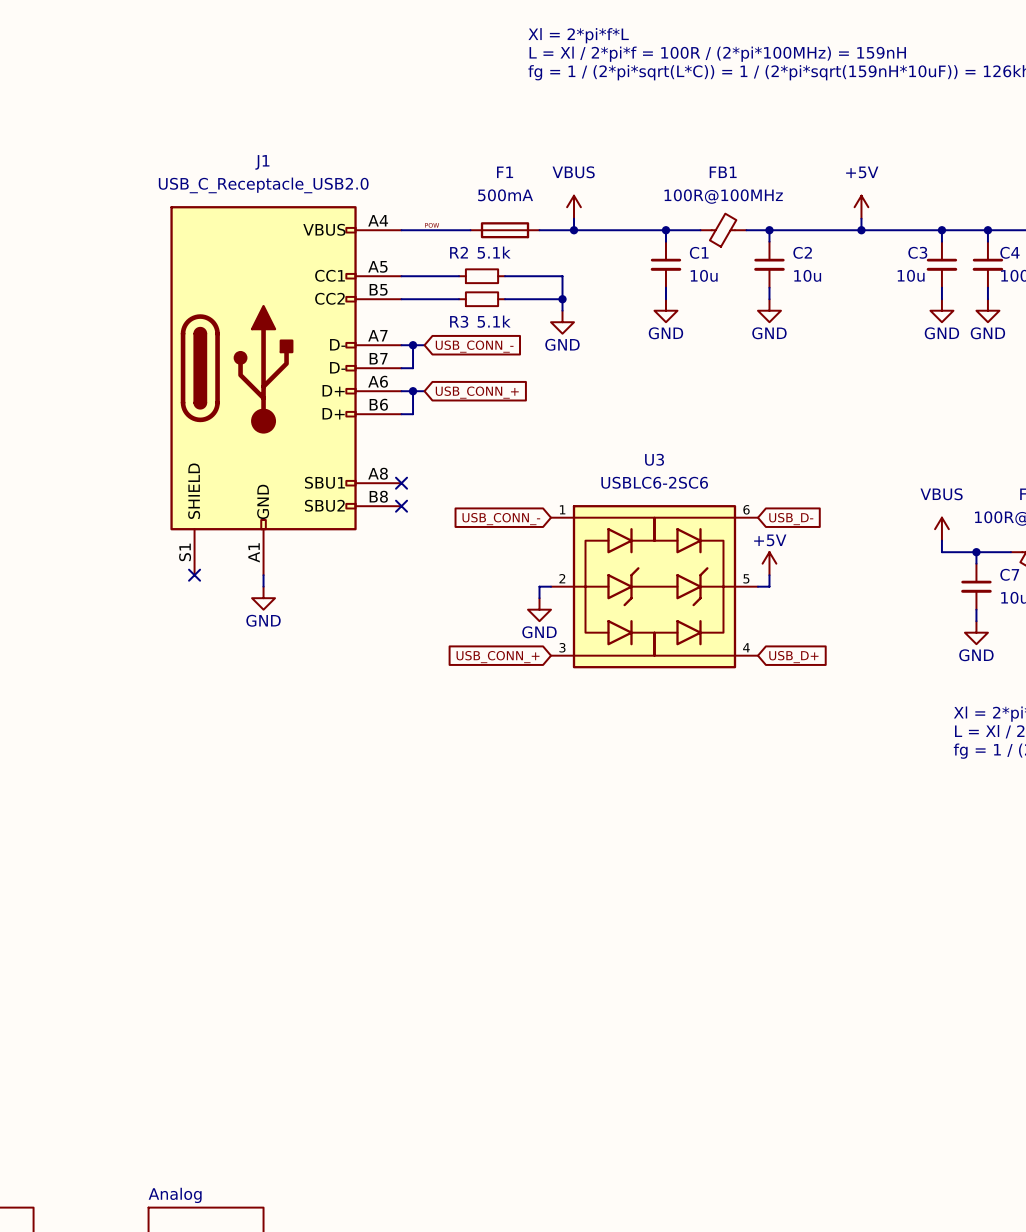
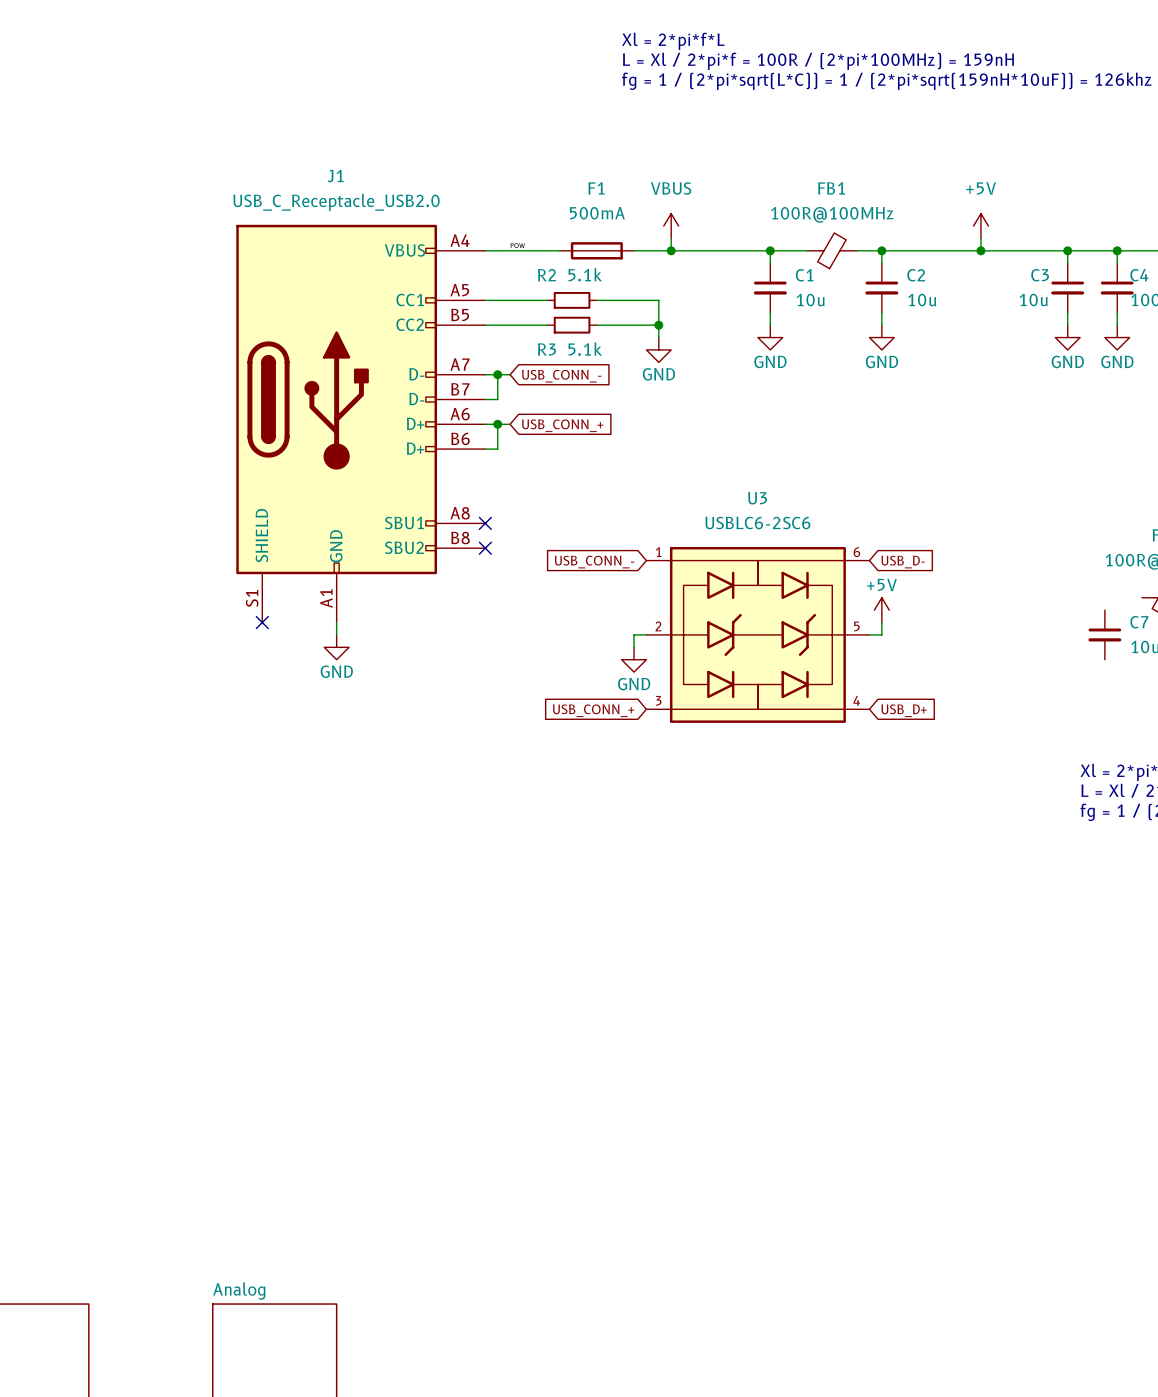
power symbol: VBUS (941, 529) -> none
wire: (941, 540) (941, 552) (1010, 552) -> none
wire: (976, 552) (976, 563) -> none
junction: (976, 552) -> none
wire: (976, 609) (976, 621) -> none
power symbol: GND (976, 632) -> none

